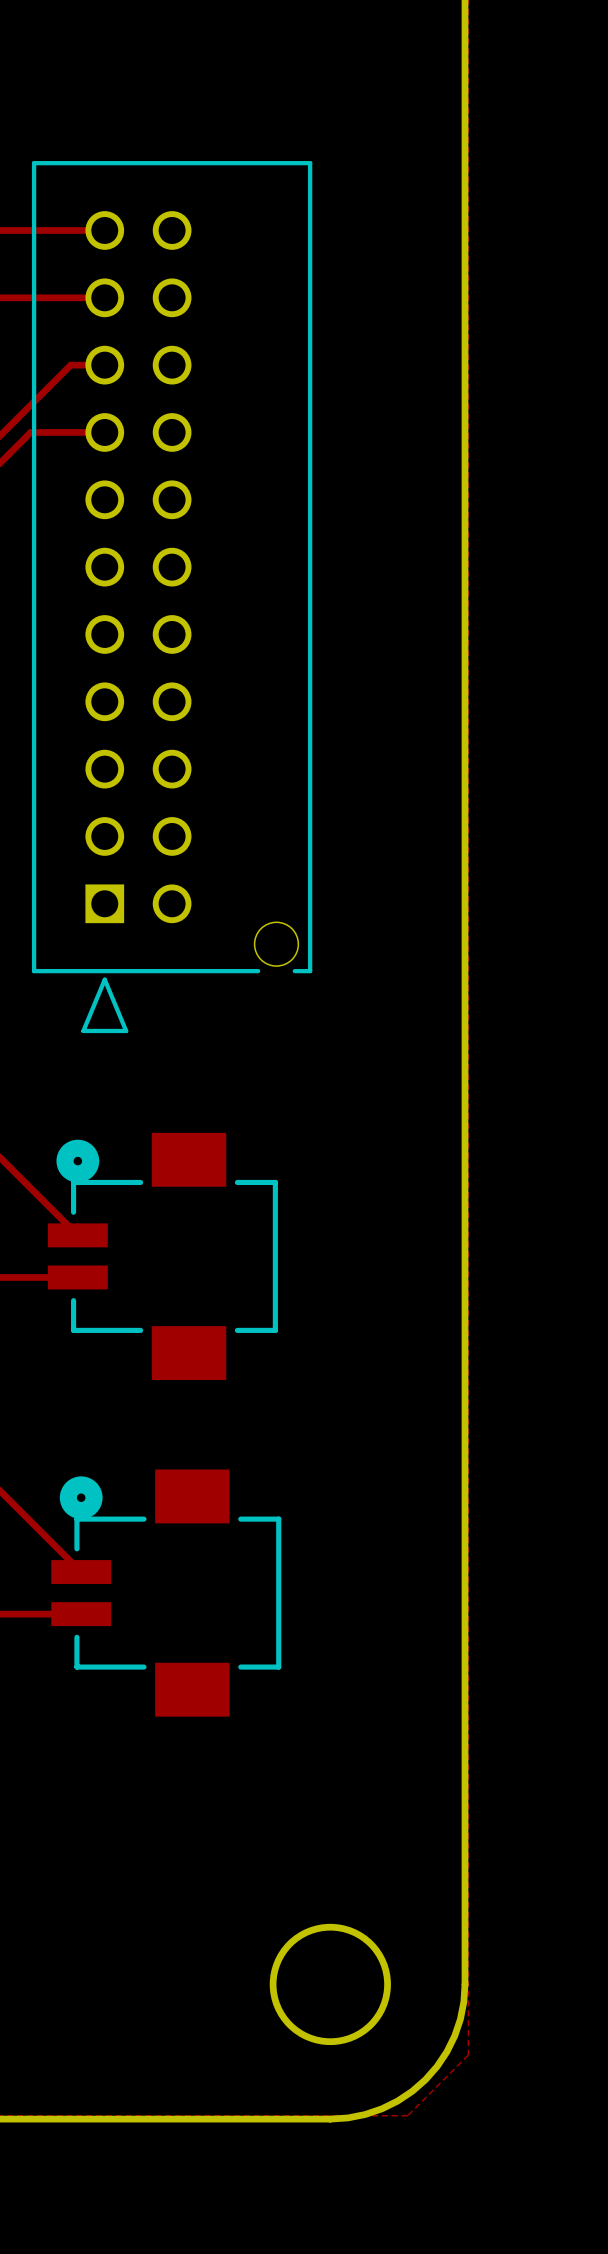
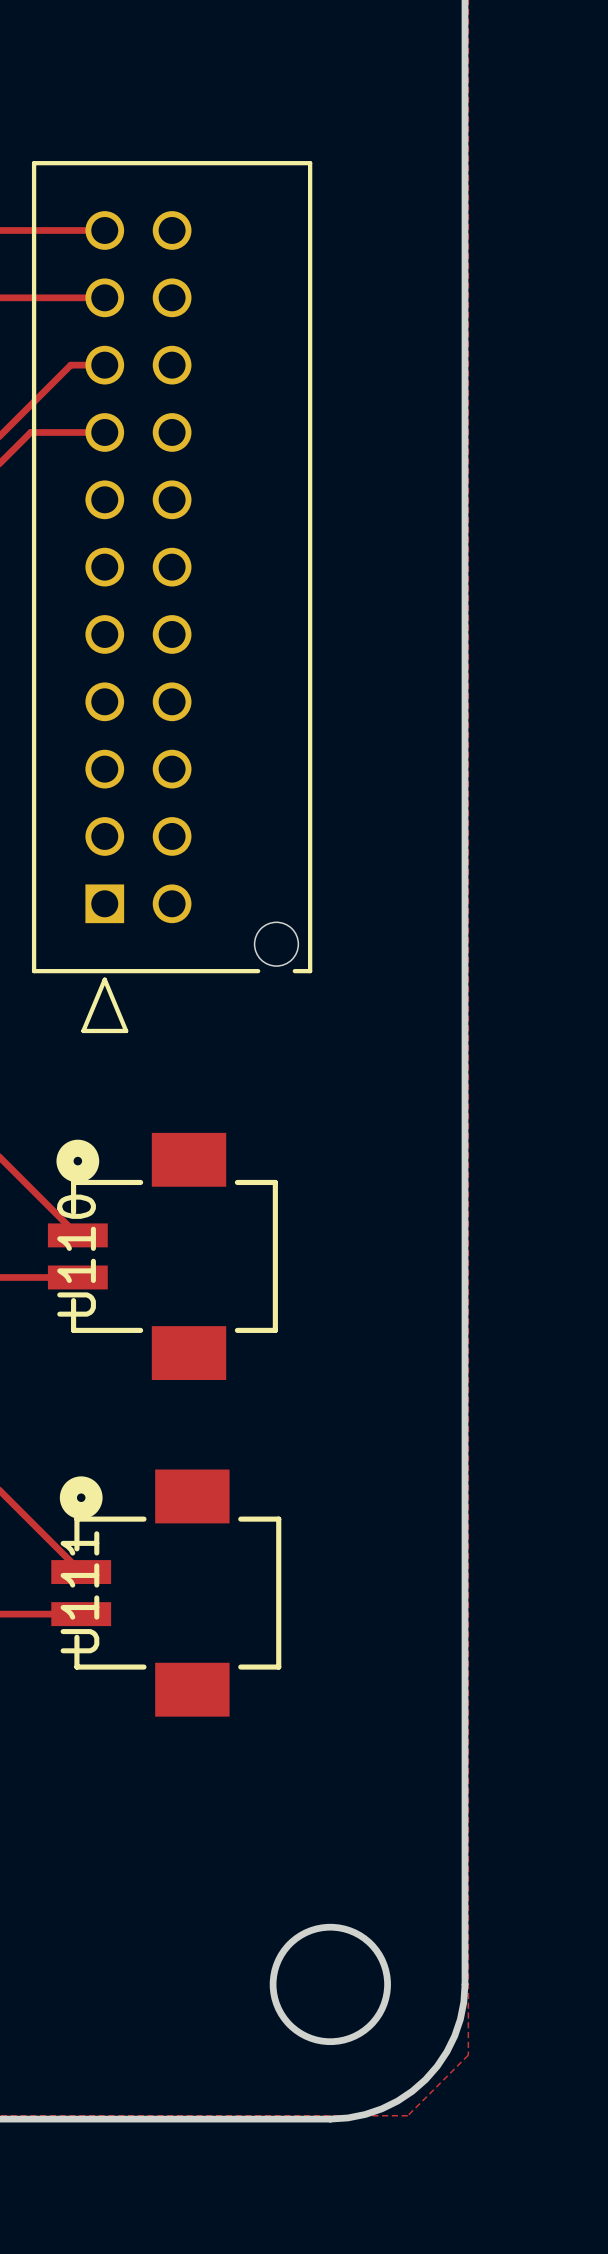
U110 name: none -> U110 (76, 1255)
U111 name: none -> U111 (79, 1592)

